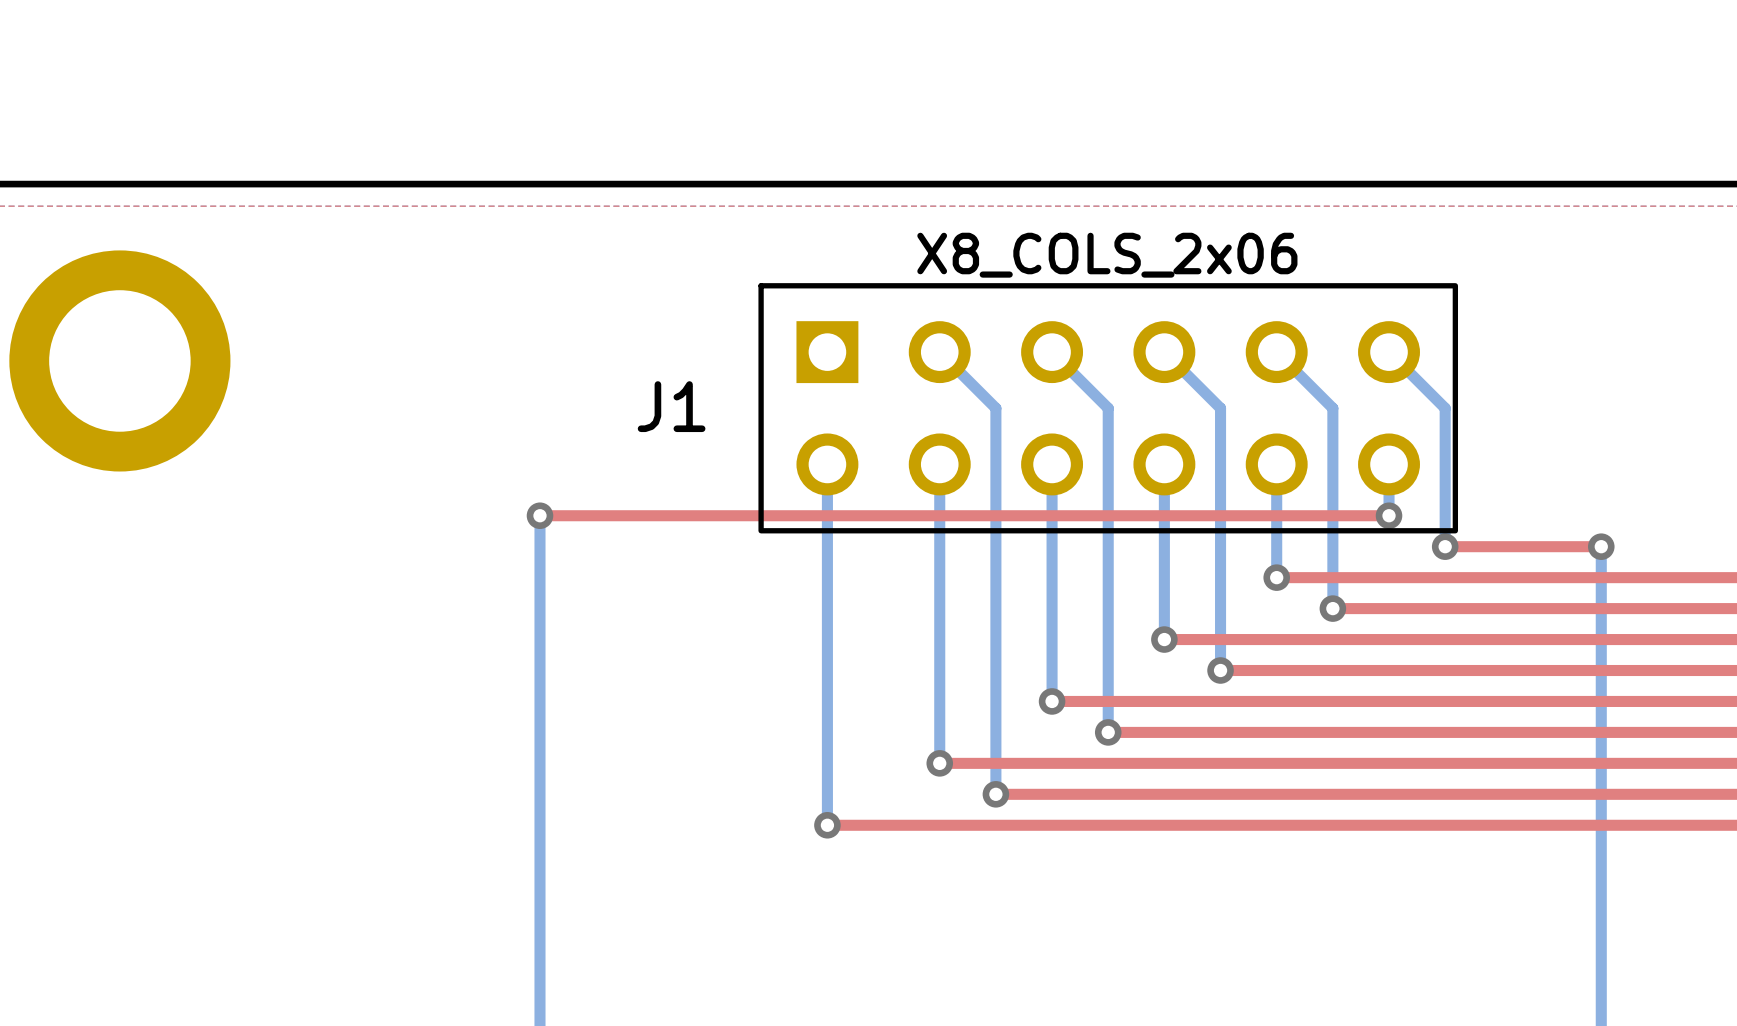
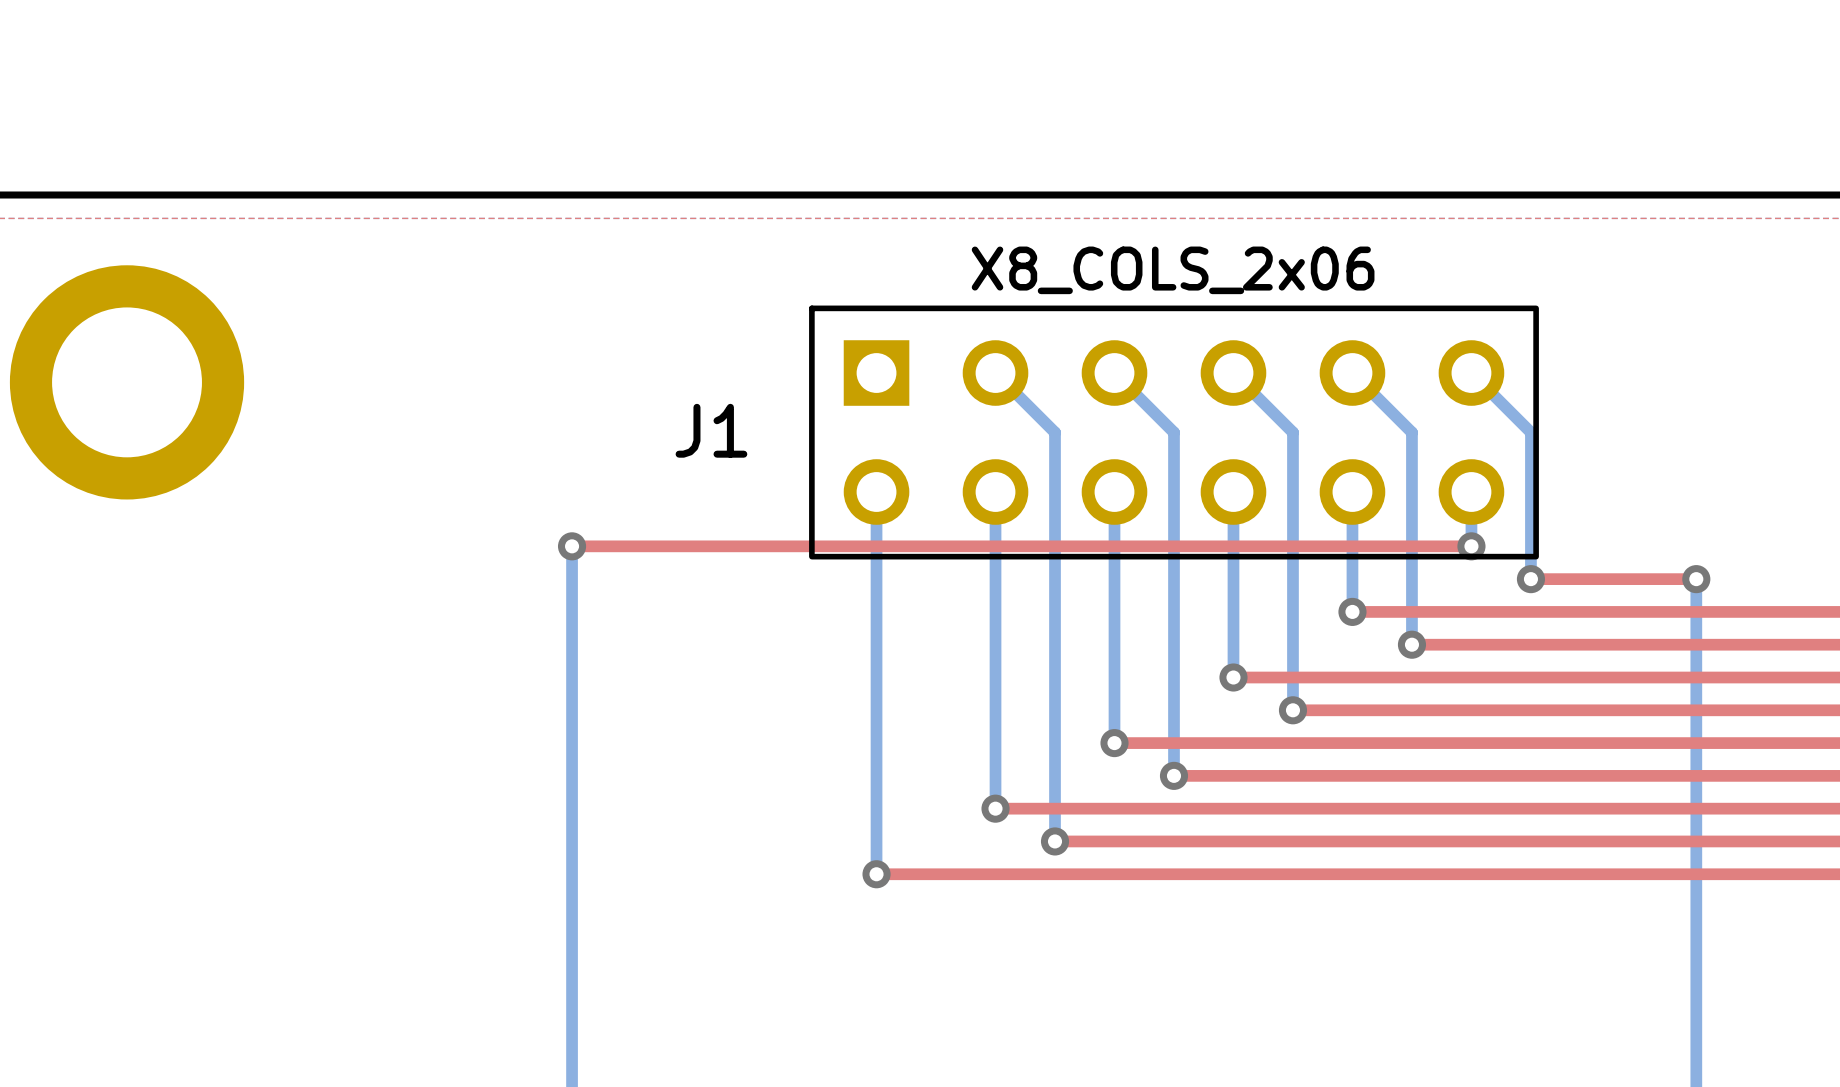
J1 footprint: [758, 283, 1459, 534] -> [809, 305, 1539, 560]

